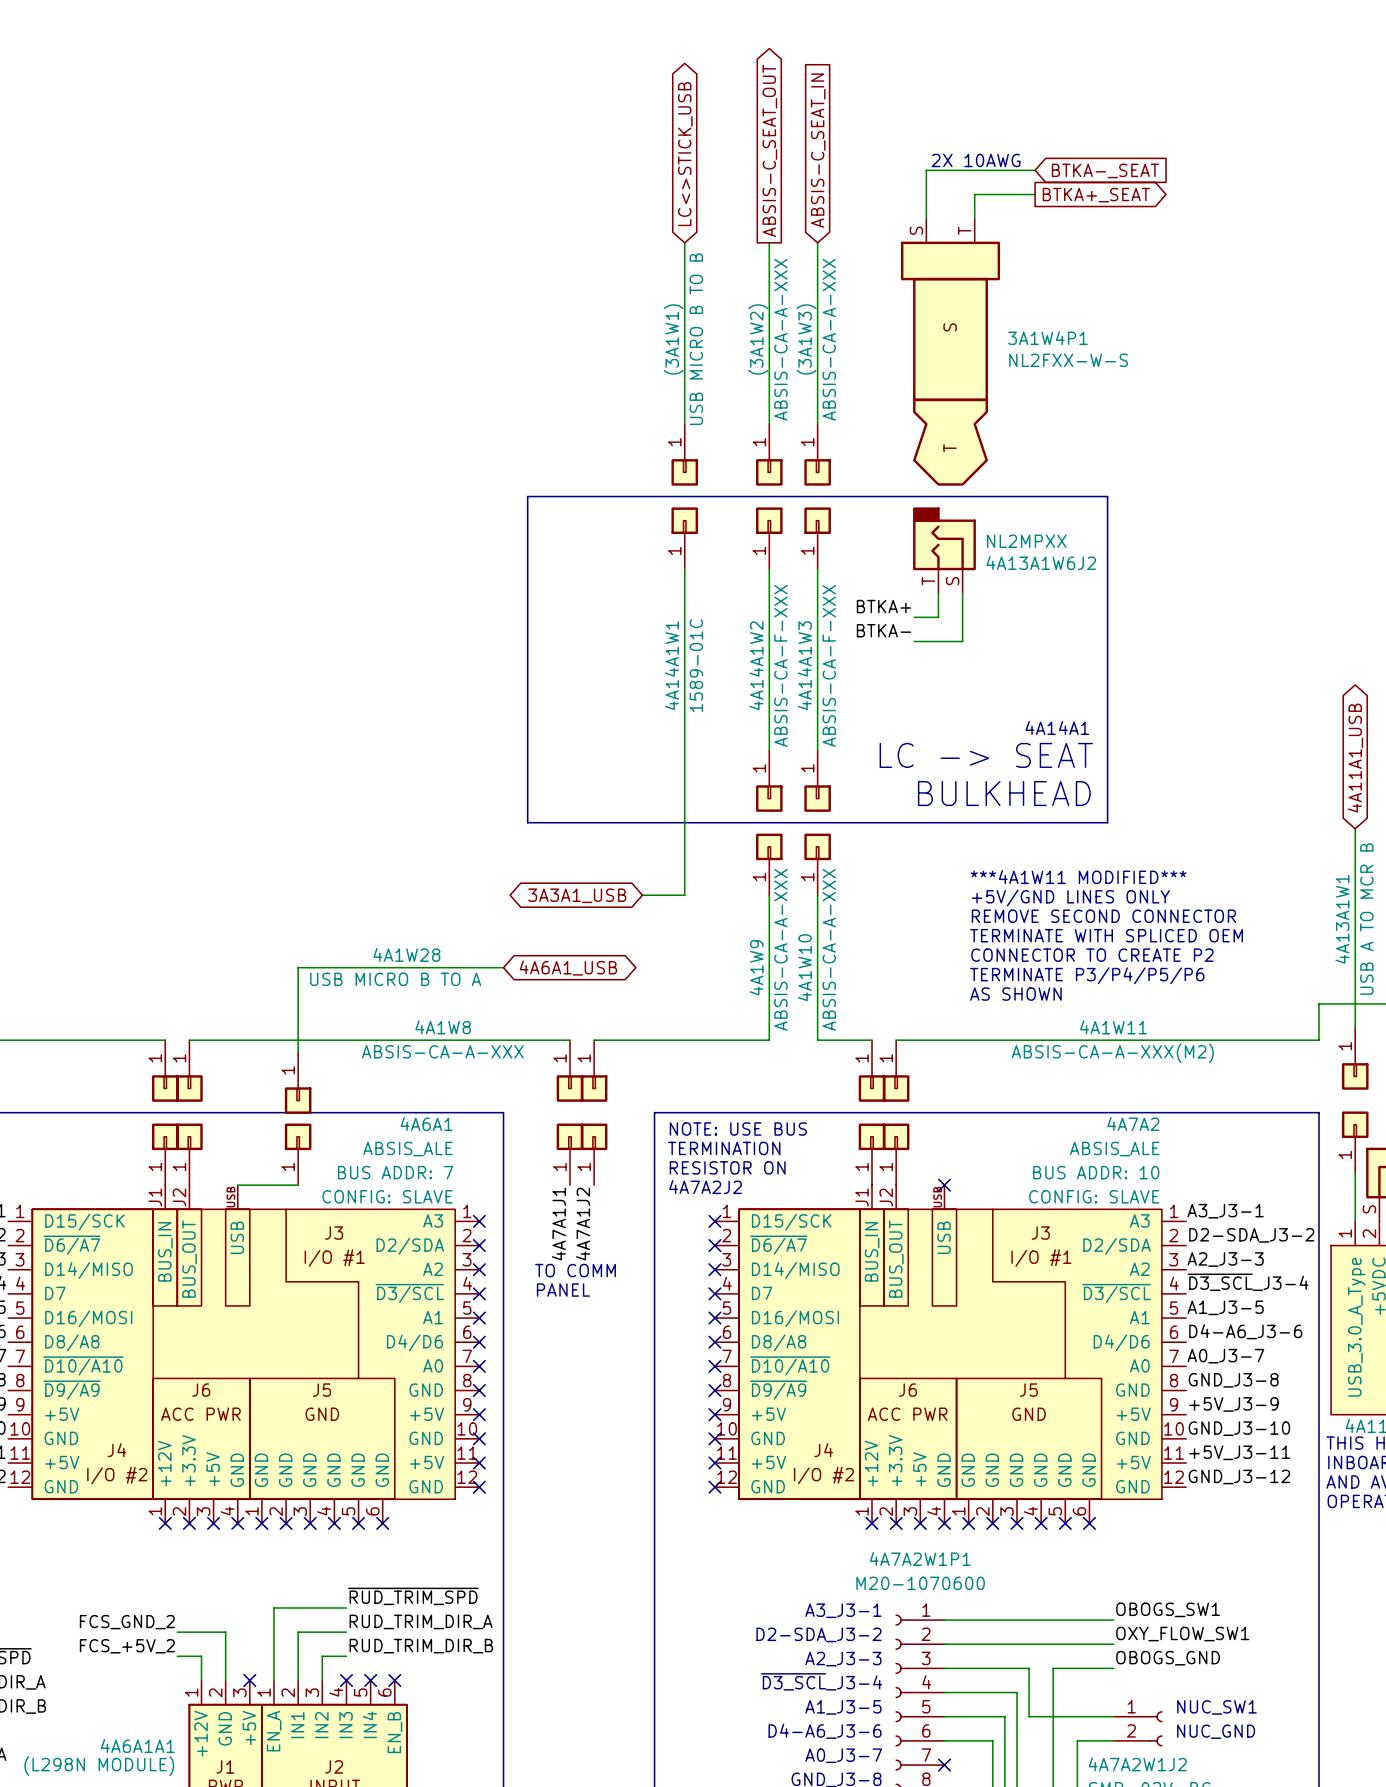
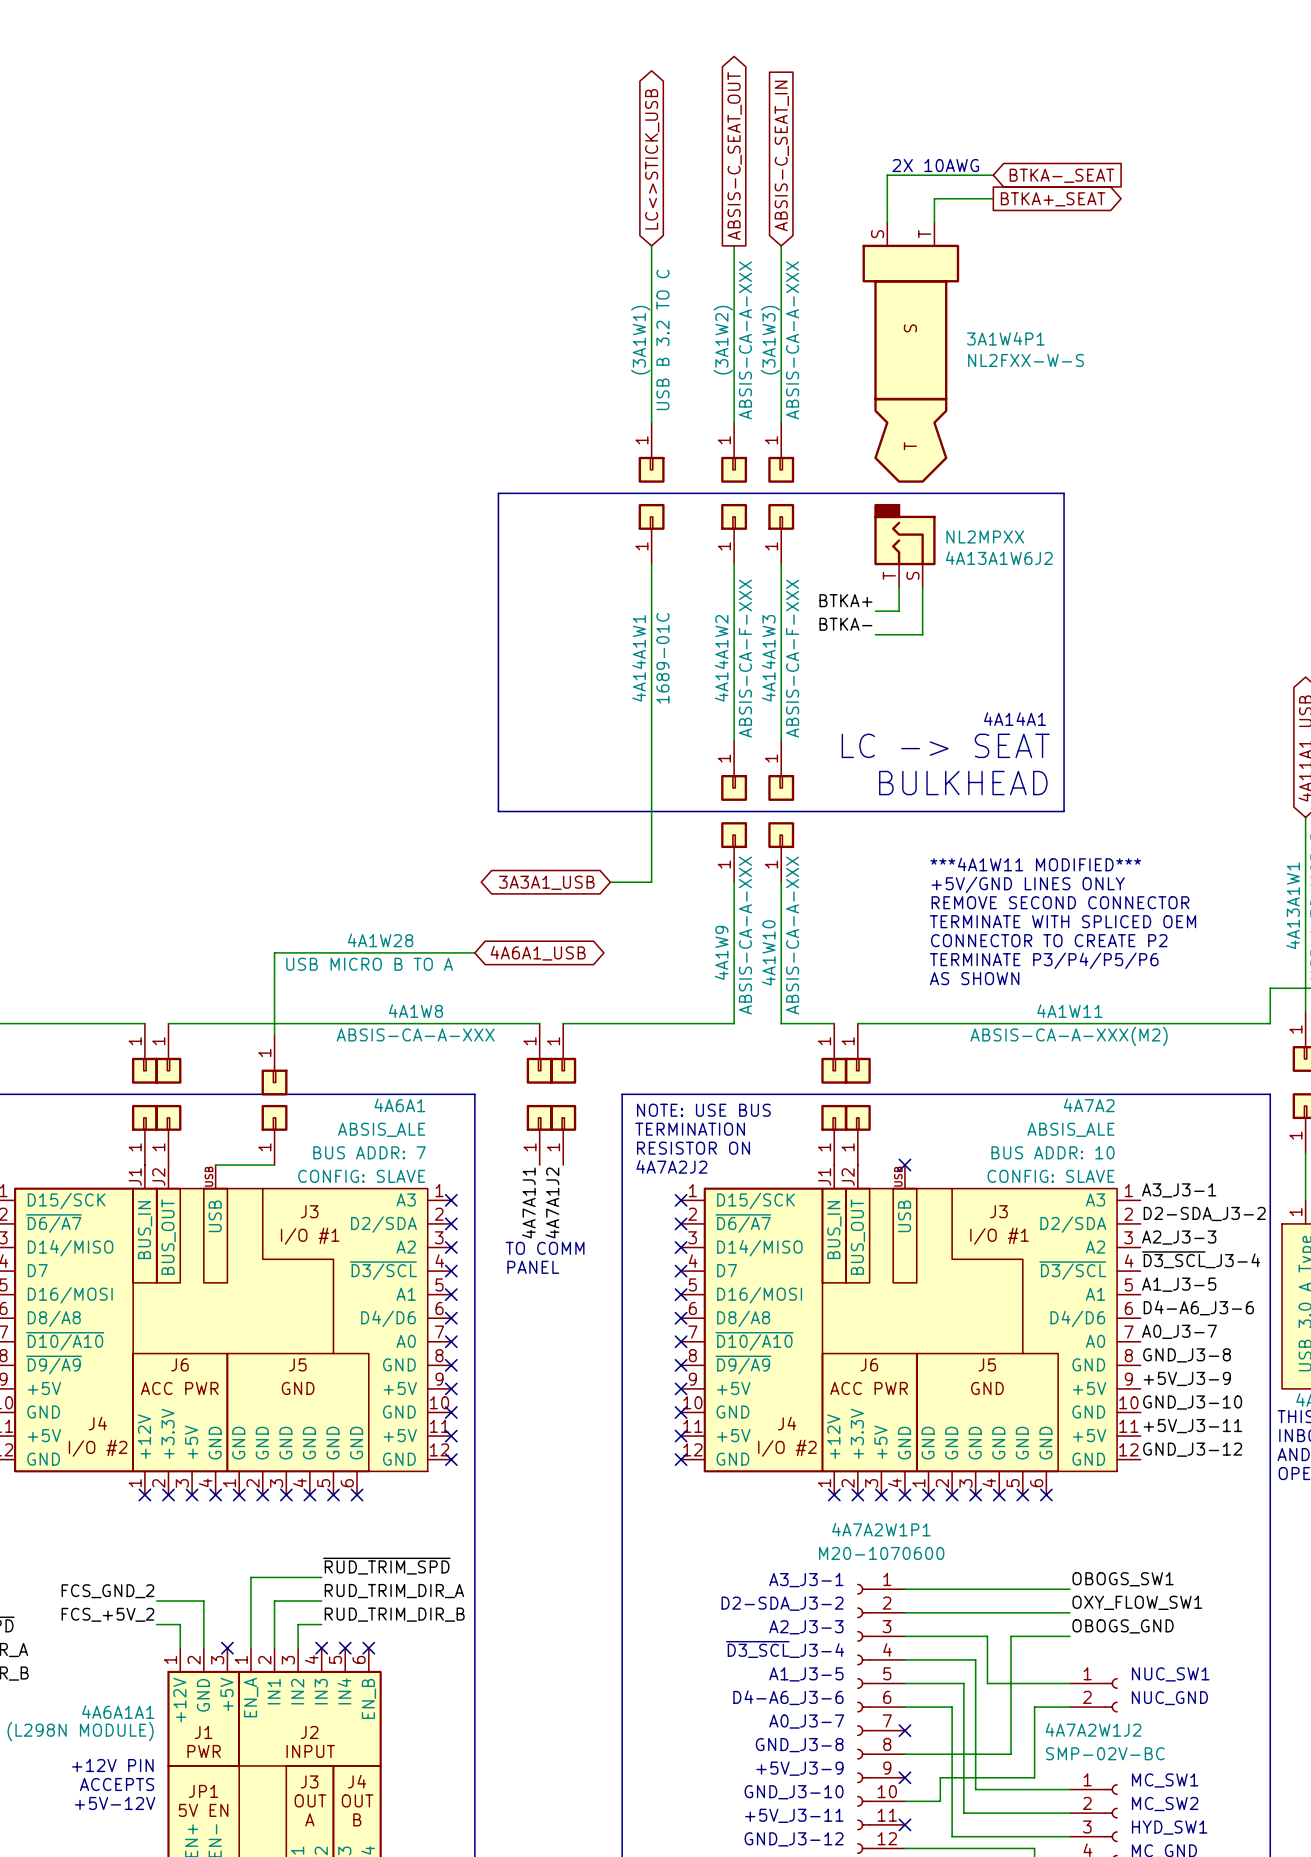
(3A1W1) value: USB MICRO B TO B (696, 339) -> USB B 3.2 TO C (662, 339)
4A14A1W1 value: 1589-01C (696, 665) -> 1689-01C (662, 658)

